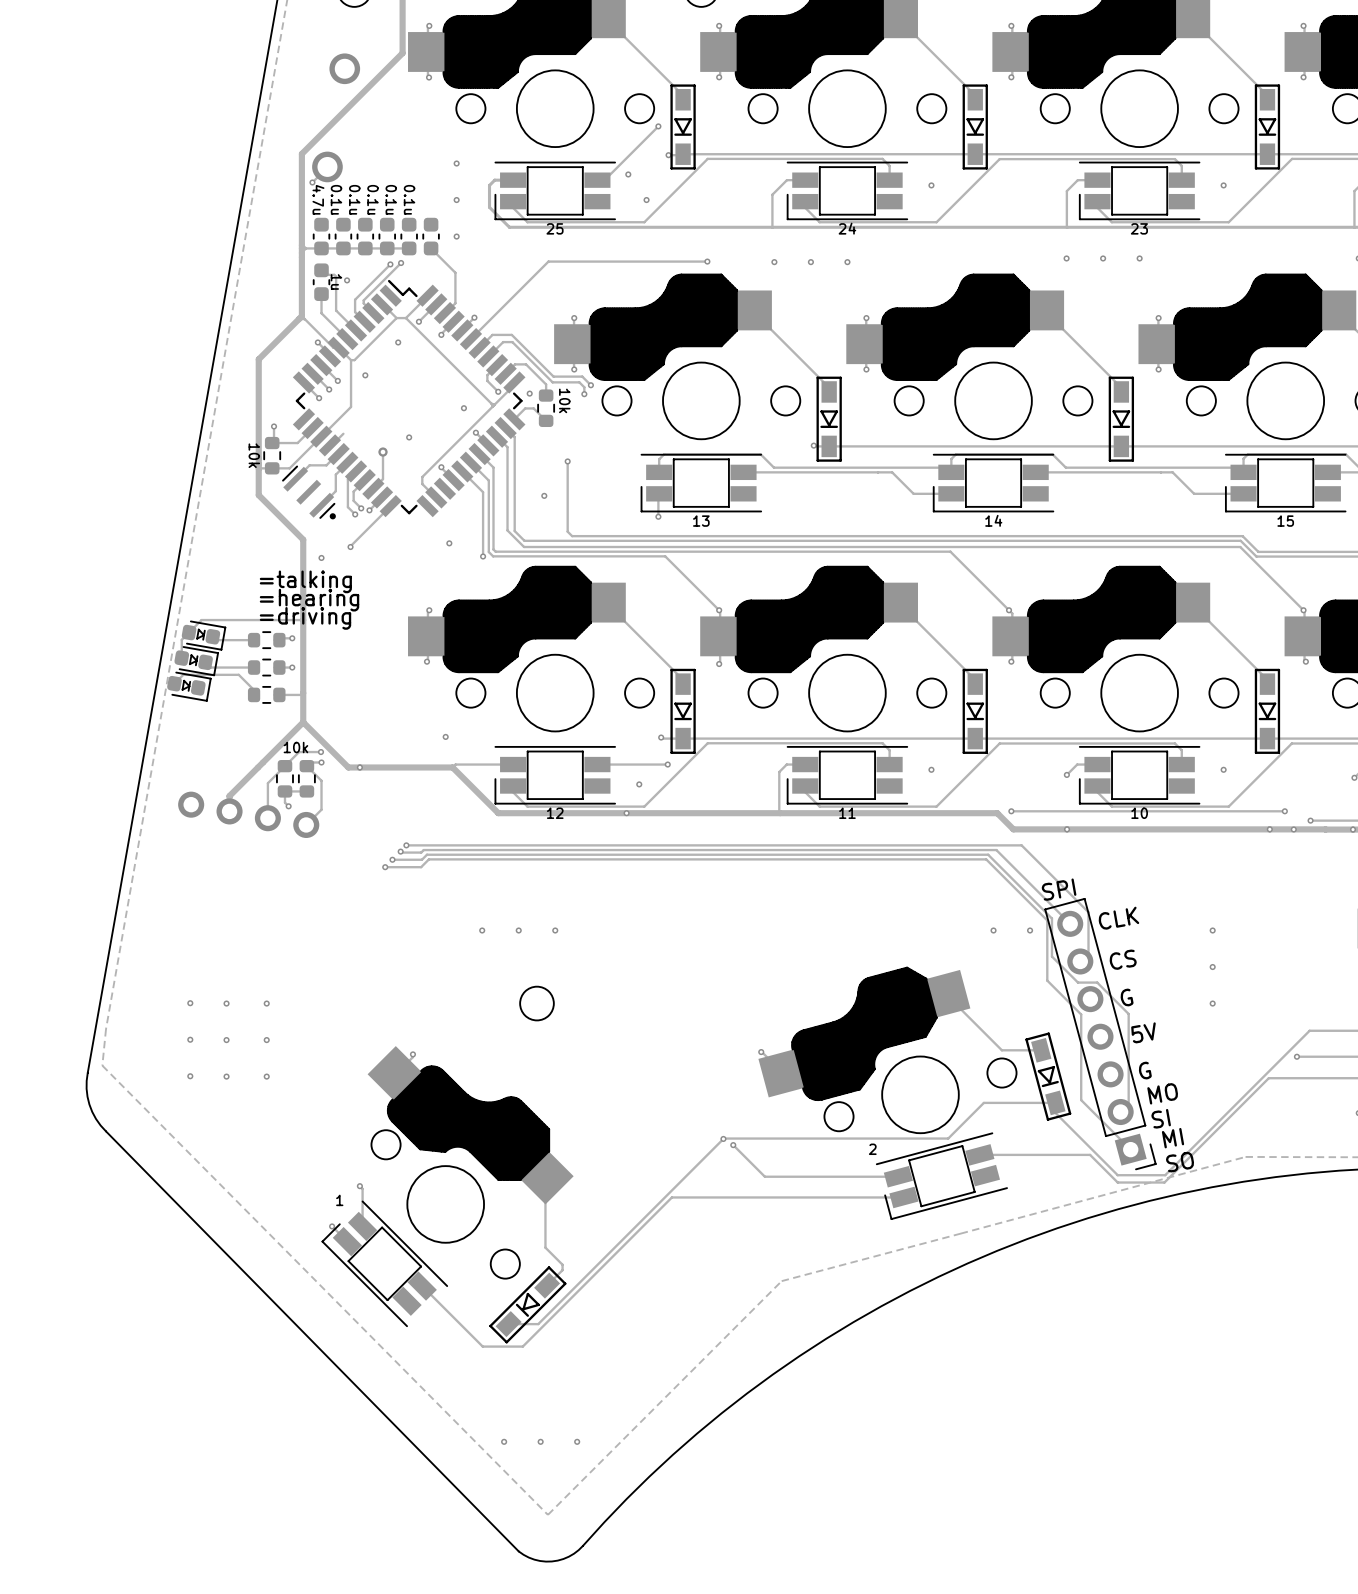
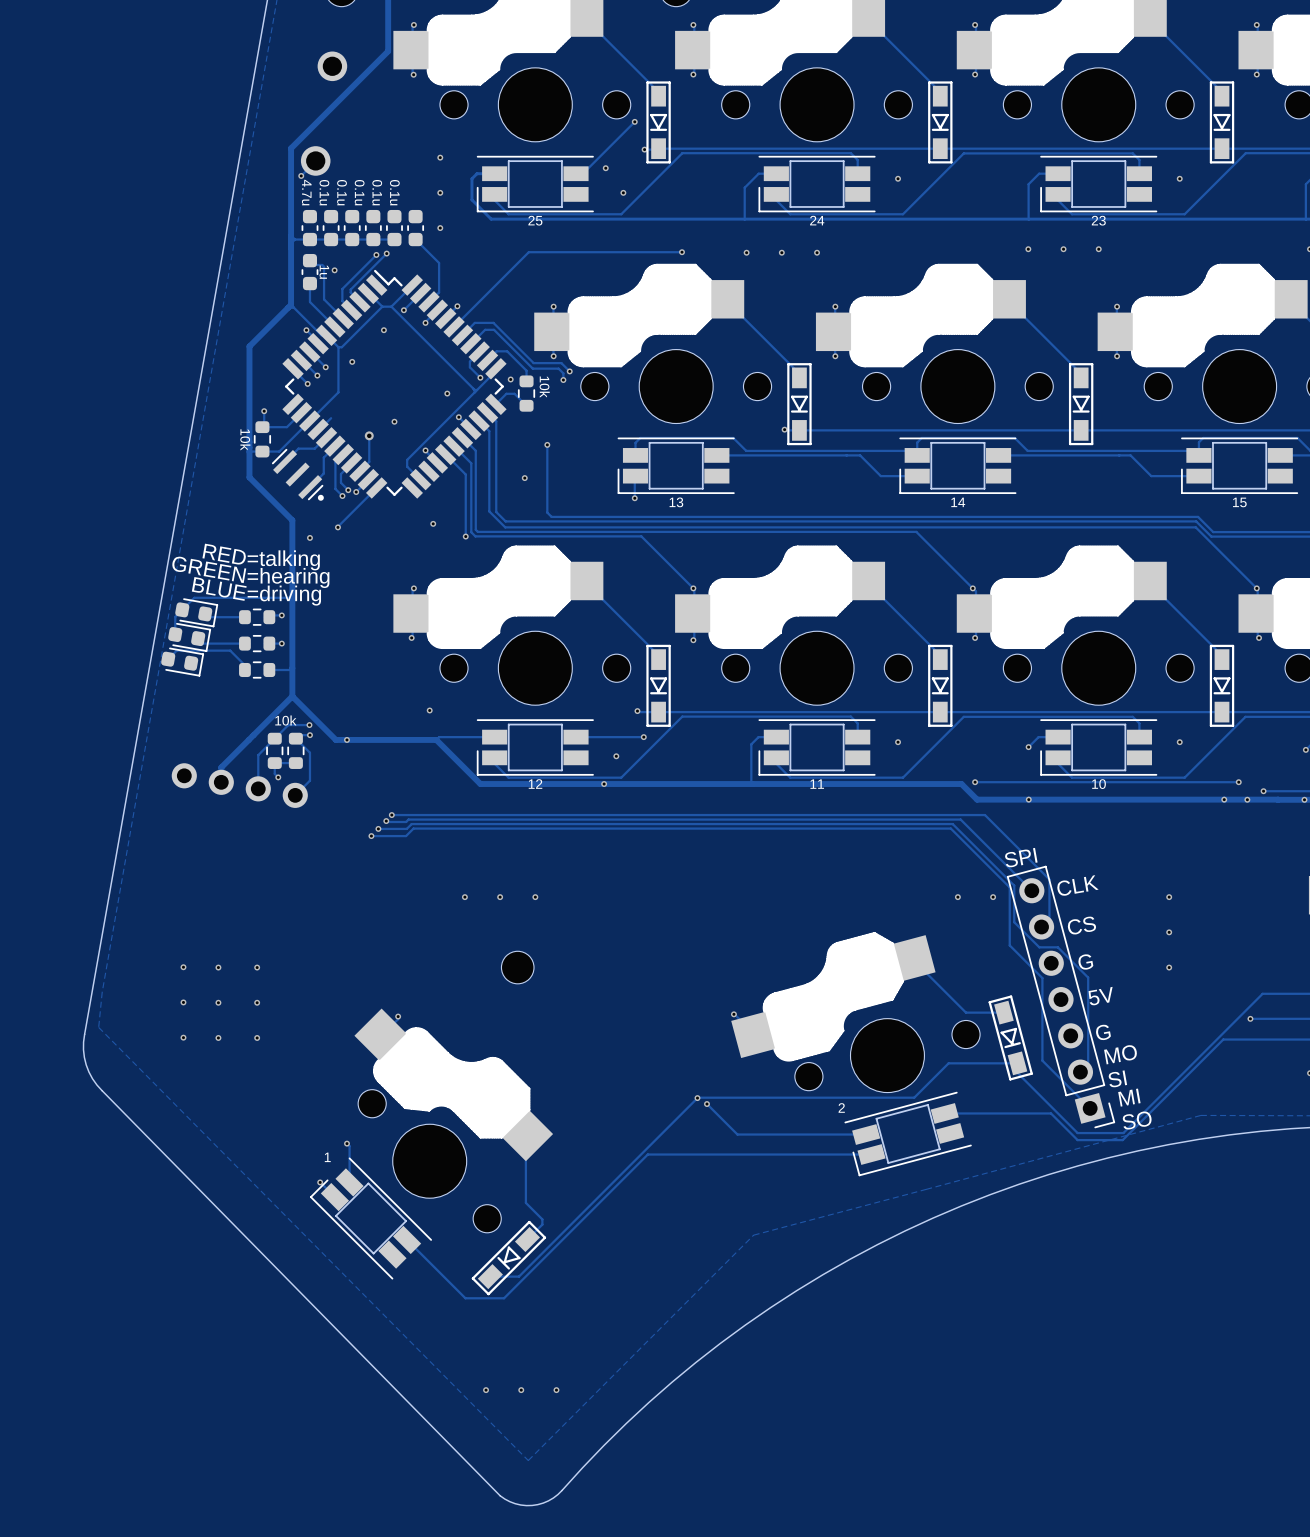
part value: none -> RED (224, 554)
part value: none -> GREEN (209, 569)
part value: none -> BLUE (219, 588)
part footprint: [181, 620, 227, 651] -> [175, 598, 219, 628]
part footprint: [174, 646, 219, 677] -> [168, 622, 212, 652]
part footprint: [167, 671, 212, 702] -> [161, 647, 205, 677]

